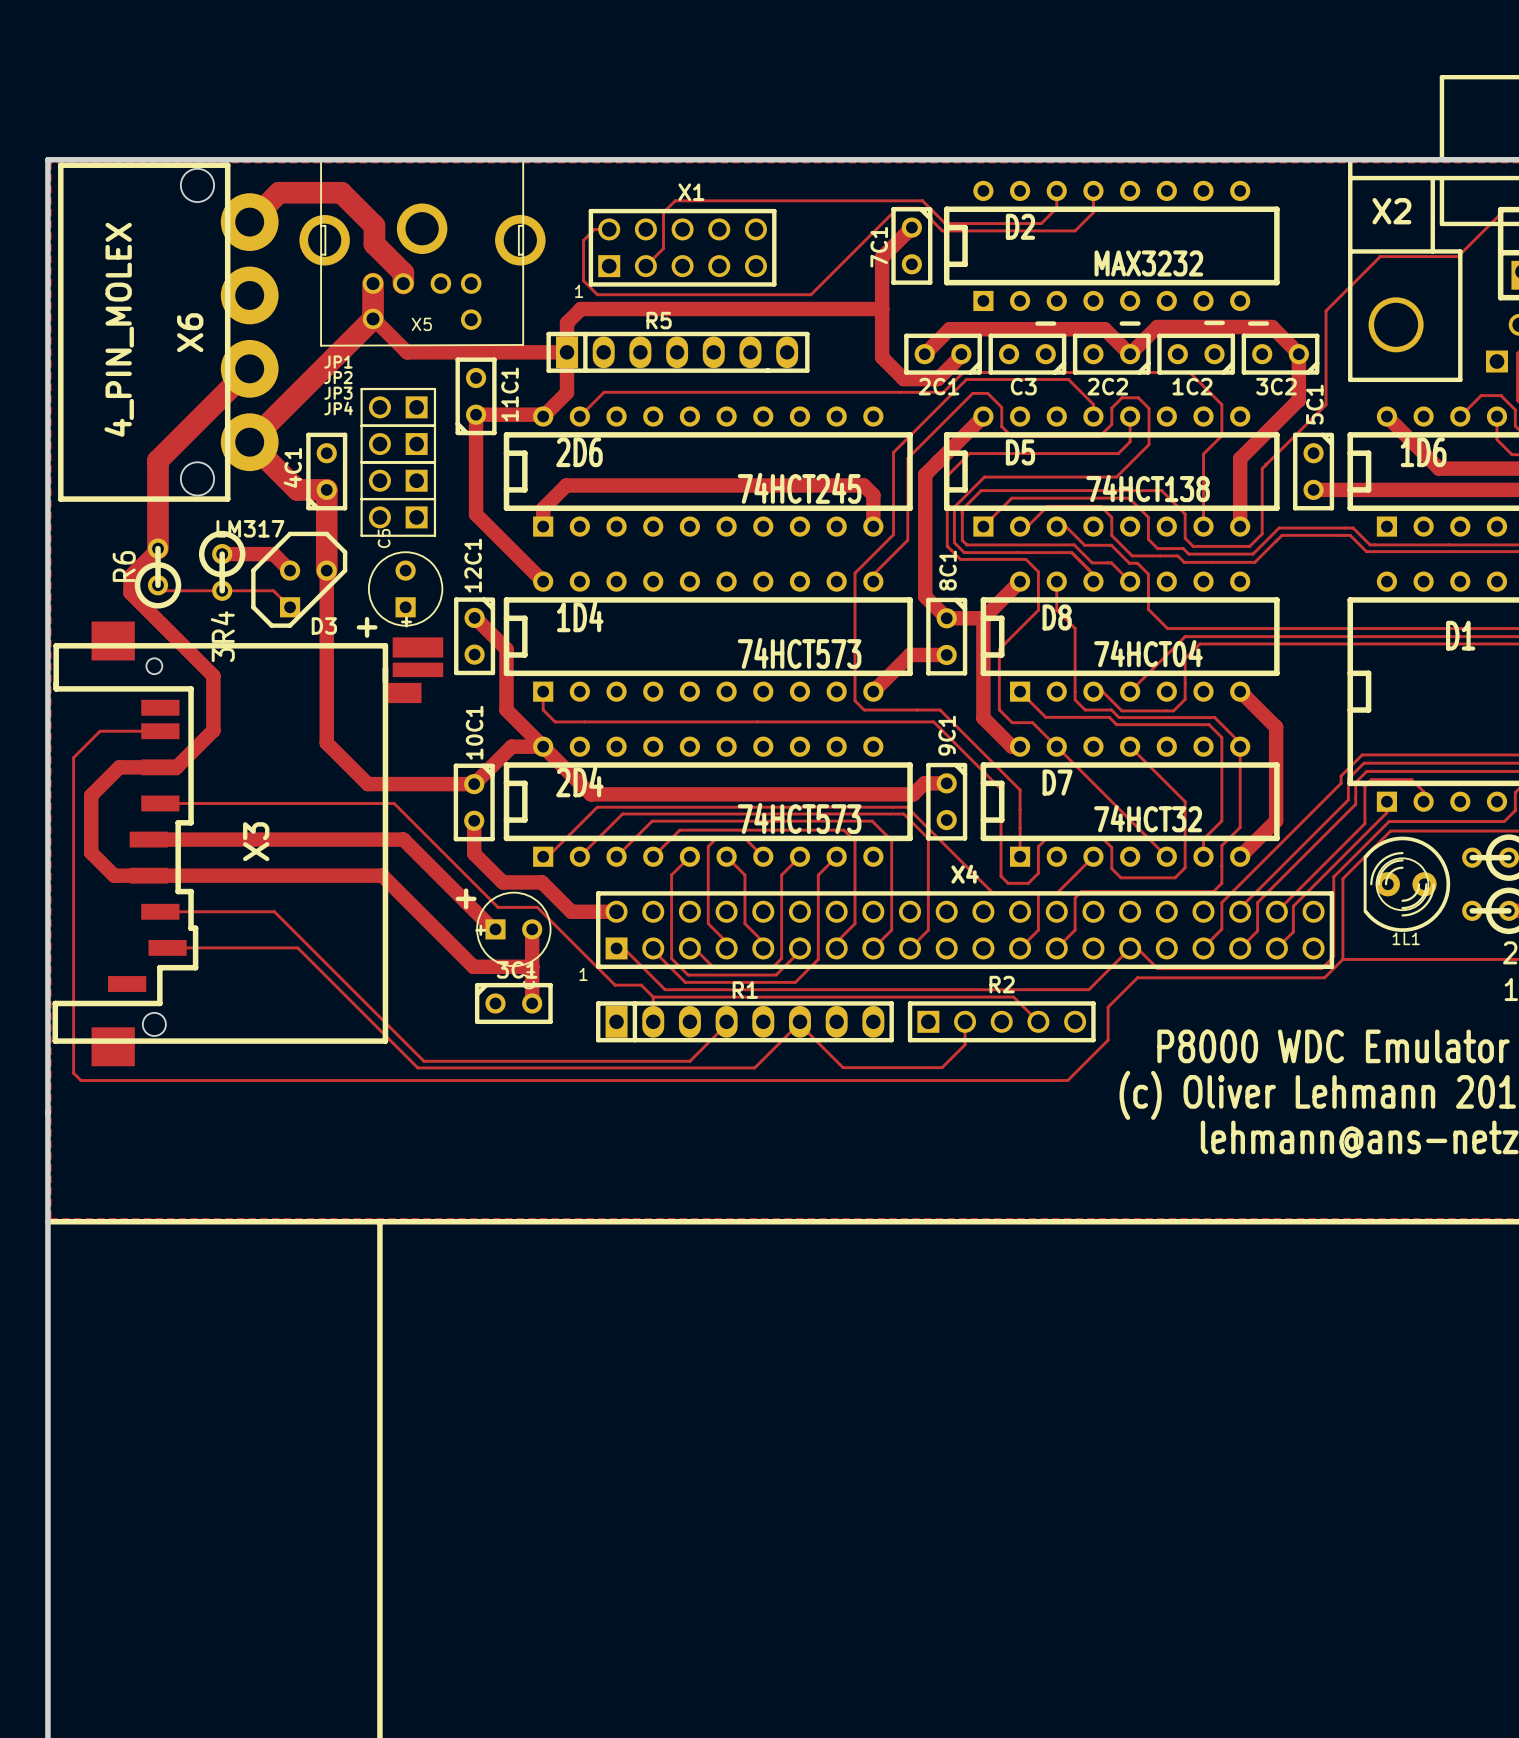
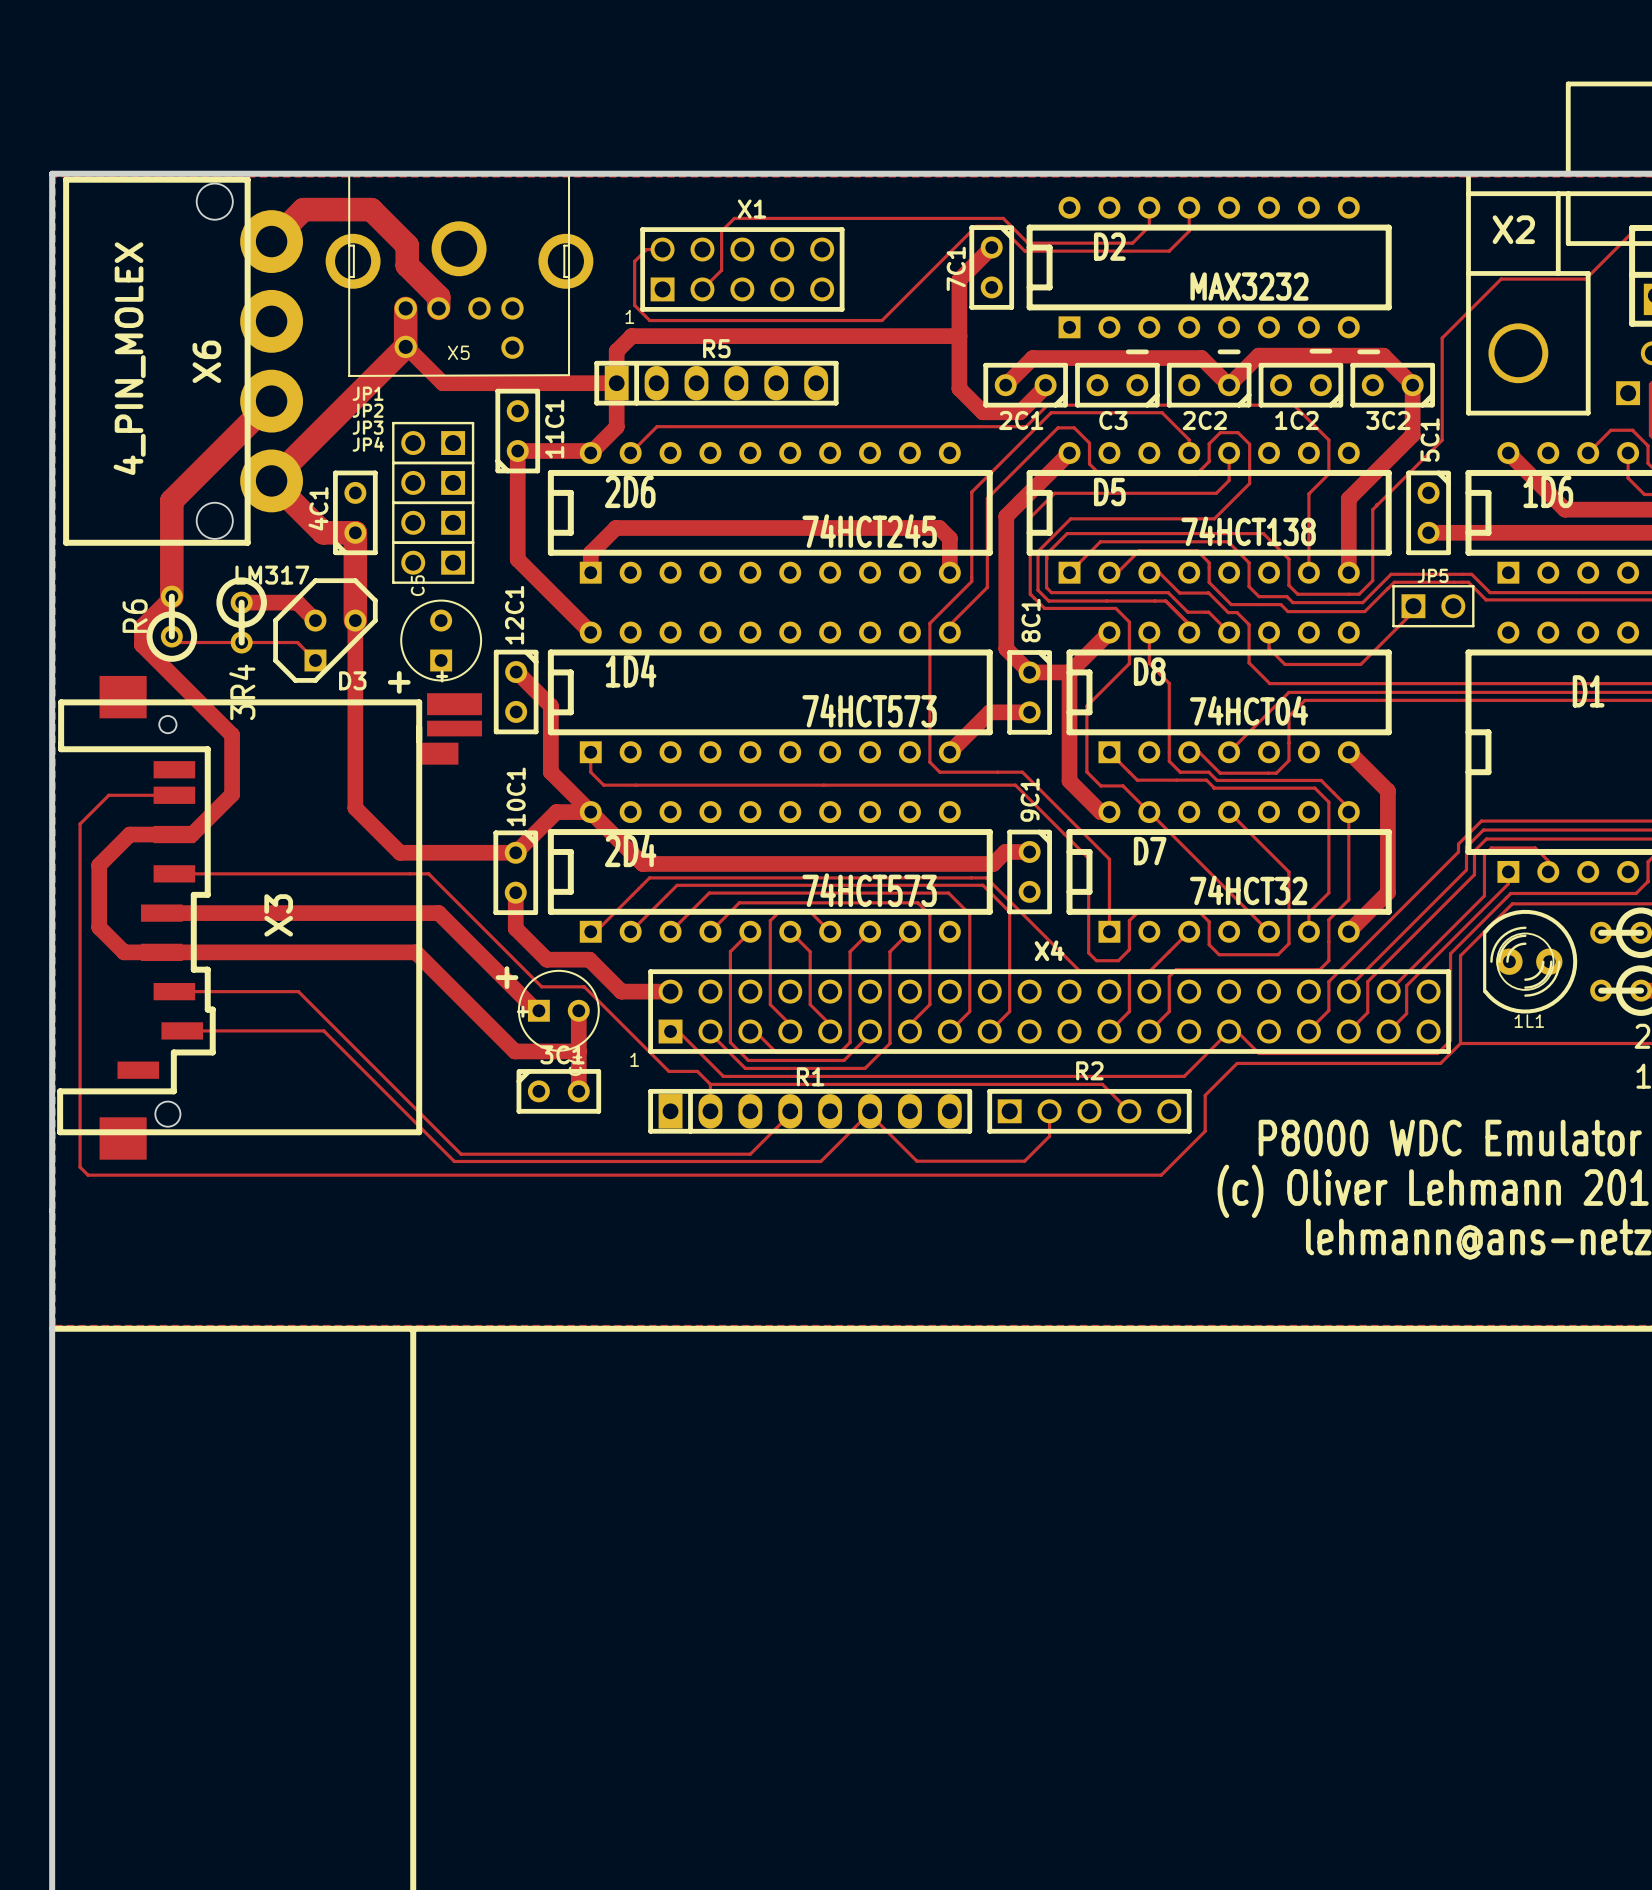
R5 footprint: [546, 331, 810, 373] -> [594, 360, 839, 406]
track: none -> (1413, 606) (1413, 611) (1360, 664) (1284, 664) (1269, 648) (1269, 632)
JP5: none -> (1433, 606)

